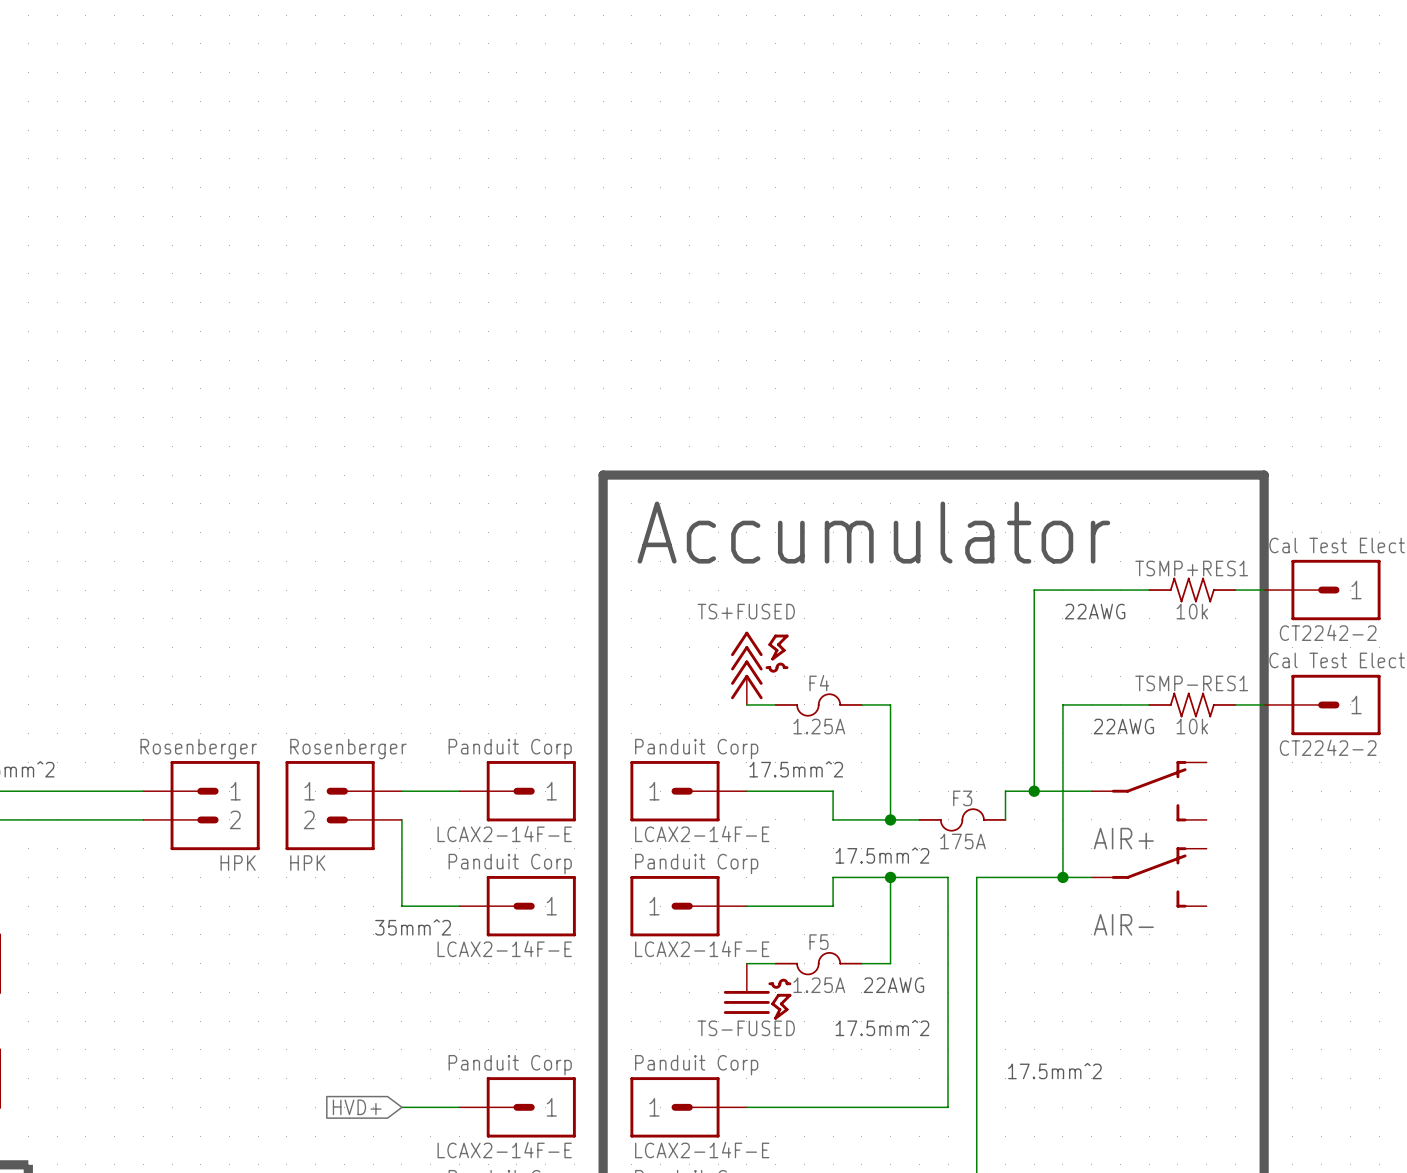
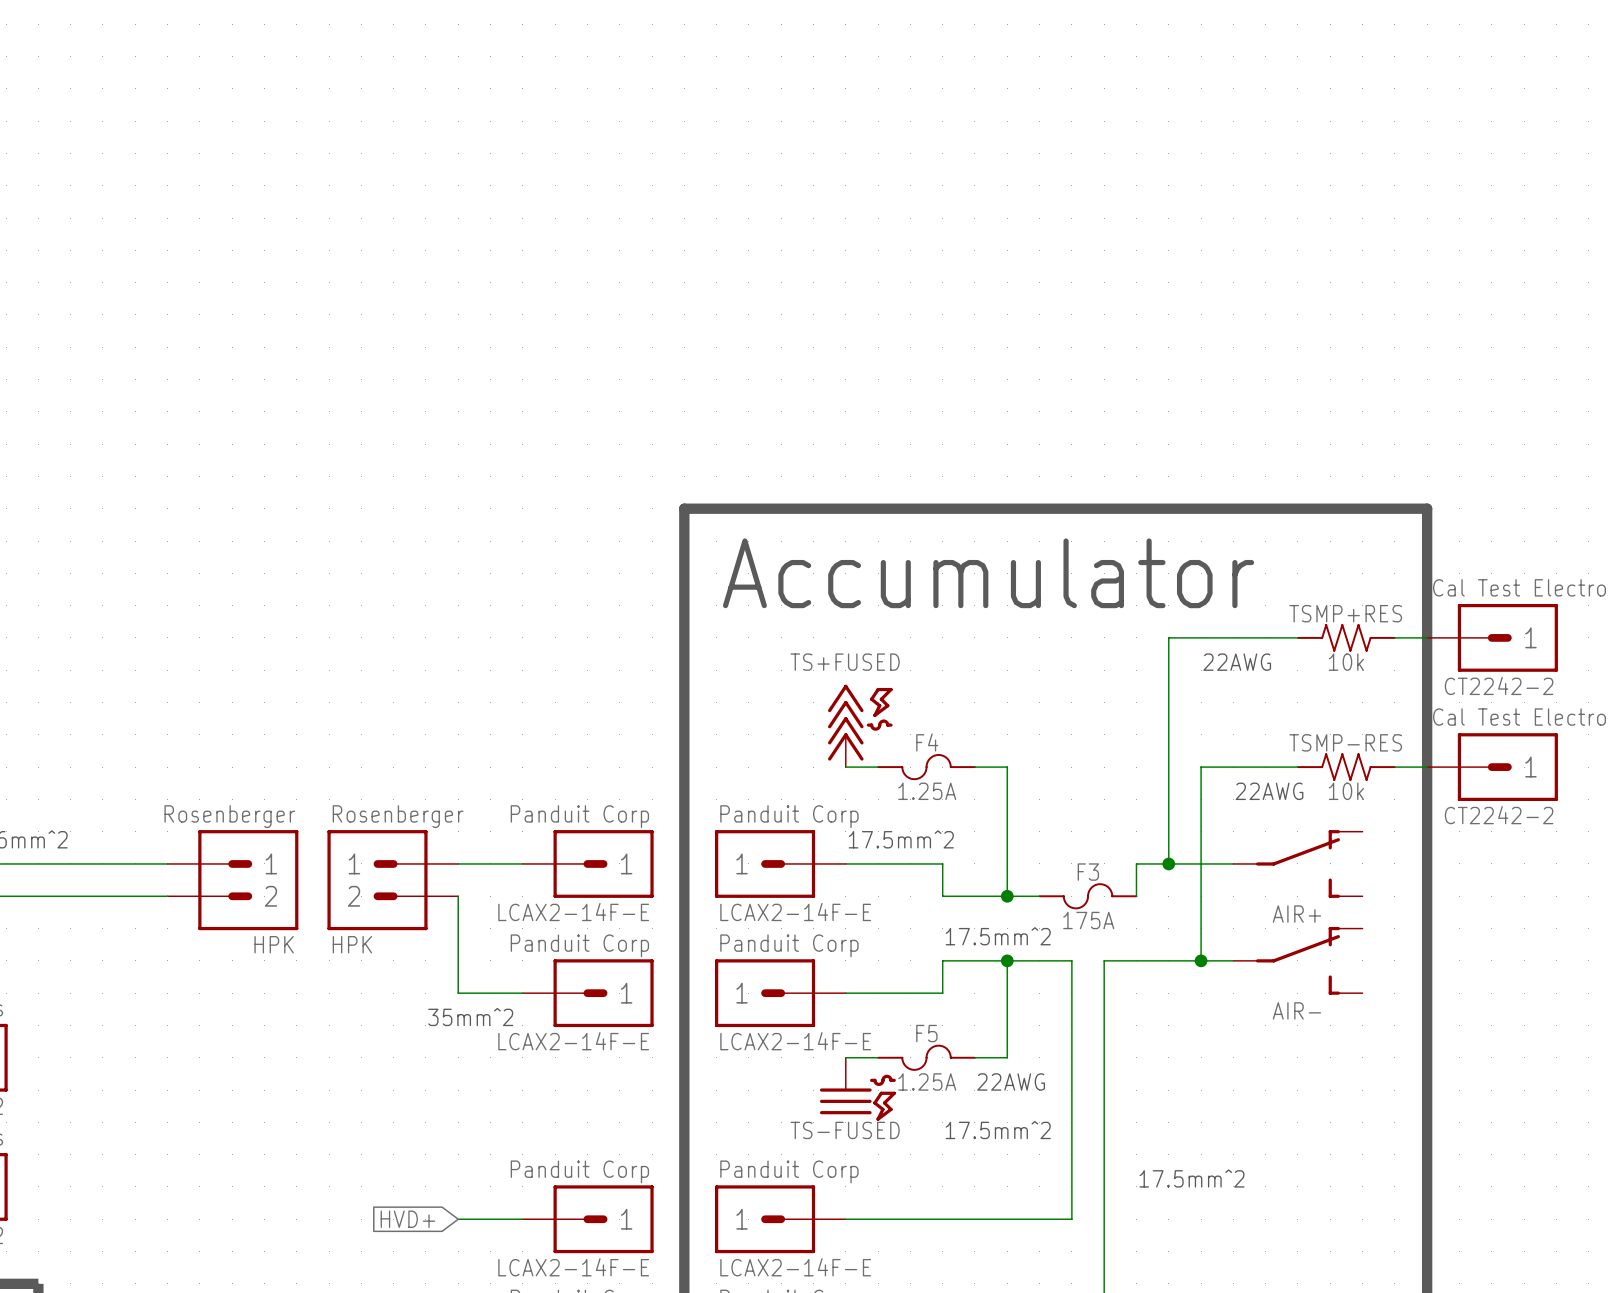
TSMP+RES1 name: TSMP+RES1 (1191, 568) -> TSMP+RES (1345, 613)
TSMP-RES1 name: TSMP-RES1 (1191, 683) -> TSMP-RES (1345, 742)
AIR+ text: none -> AIR+ (1296, 914)
AIR+ name: AIR+ (1123, 838) -> none
AIR- text: none -> AIR- (1296, 1010)
AIR- name: AIR- (1123, 924) -> none

